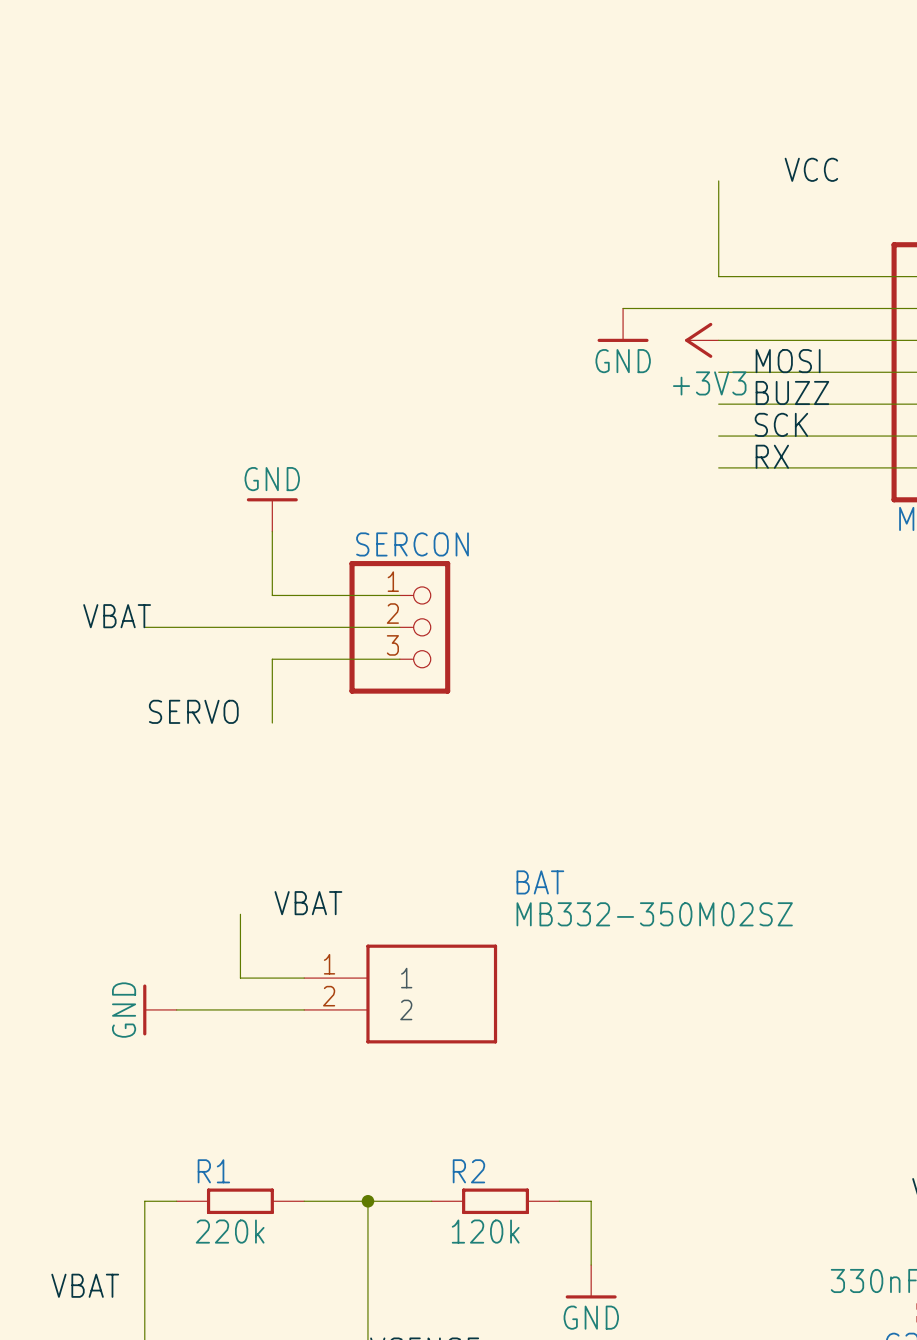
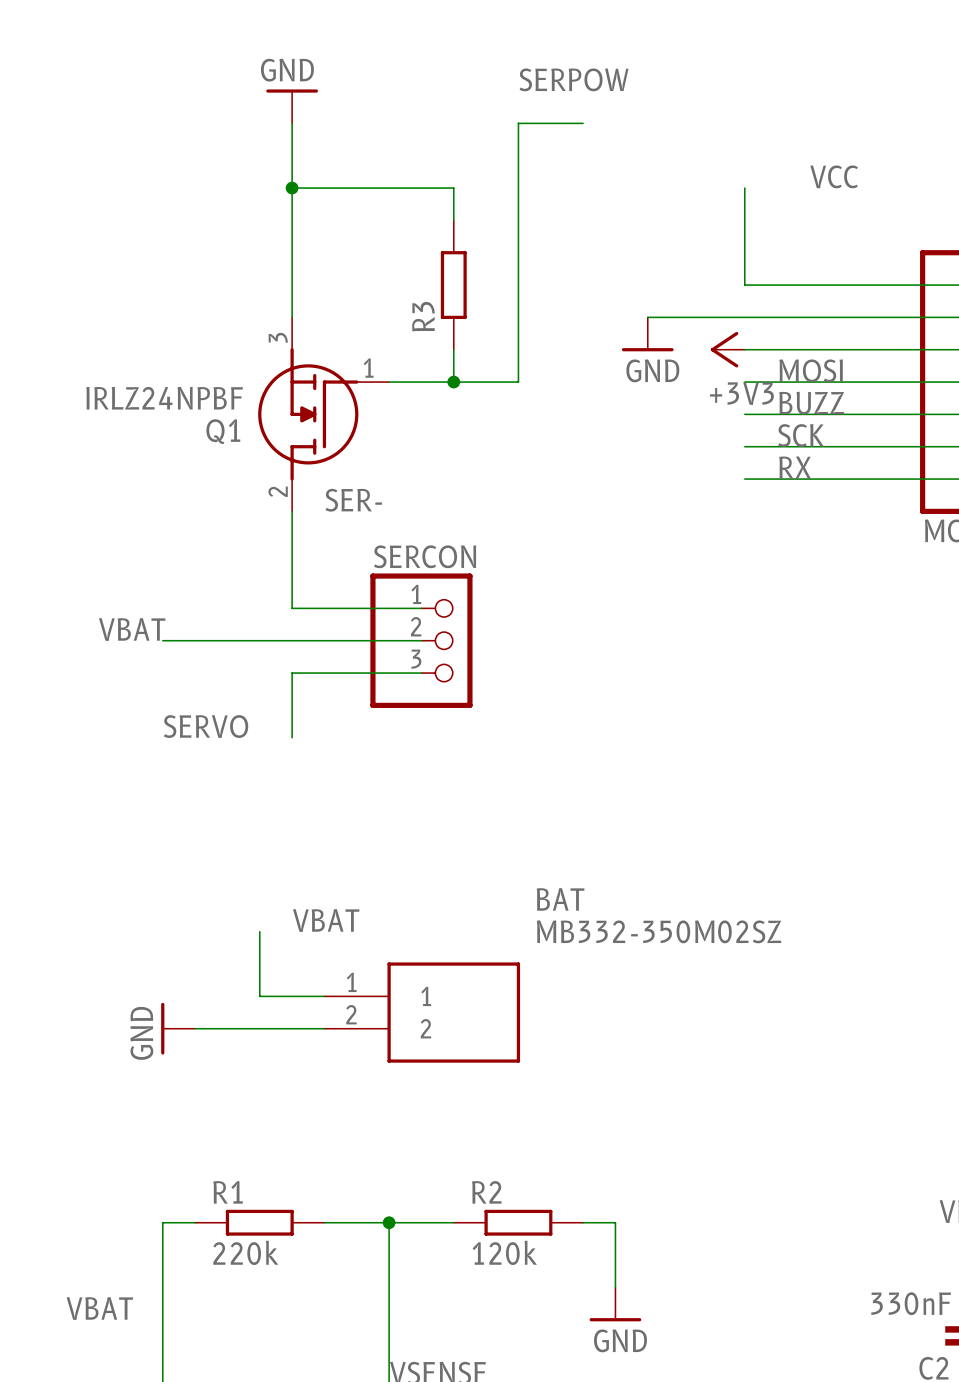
label: none -> SERPOW (574, 79)
power symbol: none -> GND (292, 106)
wire: none -> (292, 123) (292, 317)
wire: none -> (583, 123) (518, 123) (518, 382) (389, 382)
wire: none -> (292, 188) (453, 188) (453, 220)
junction: none -> (292, 188)
R3: none -> (453, 285)
wire: none -> (453, 349) (453, 382)
junction: none -> (453, 382)
Q1: none -> IRLZ24NPBF (323, 414)
label: none -> SER- (353, 500)
power symbol: GND (272, 514) -> none

